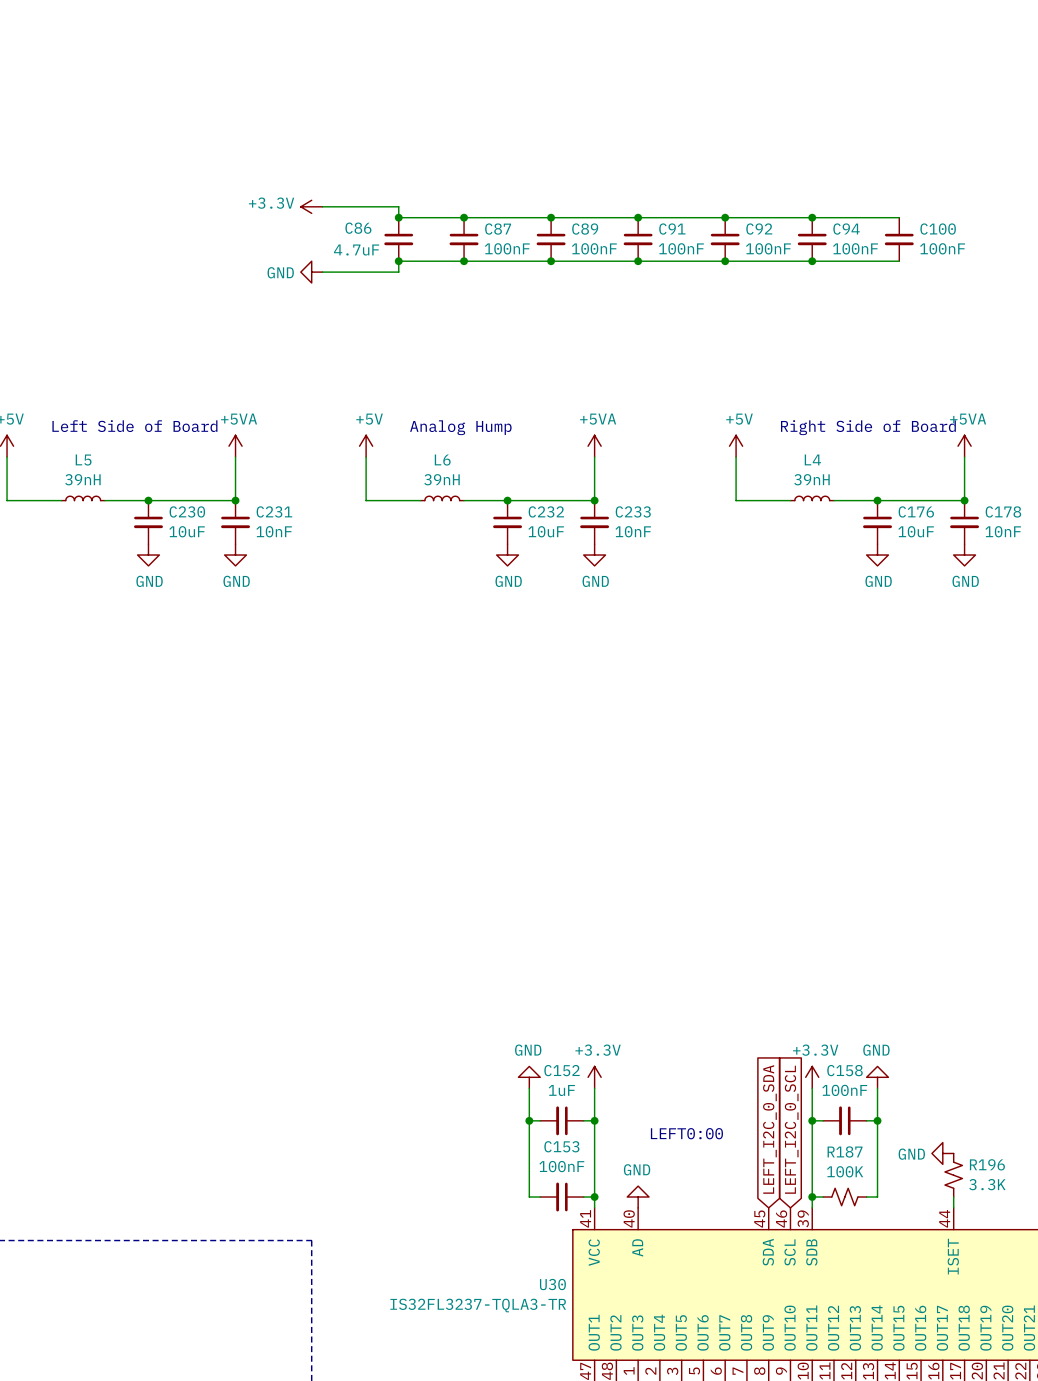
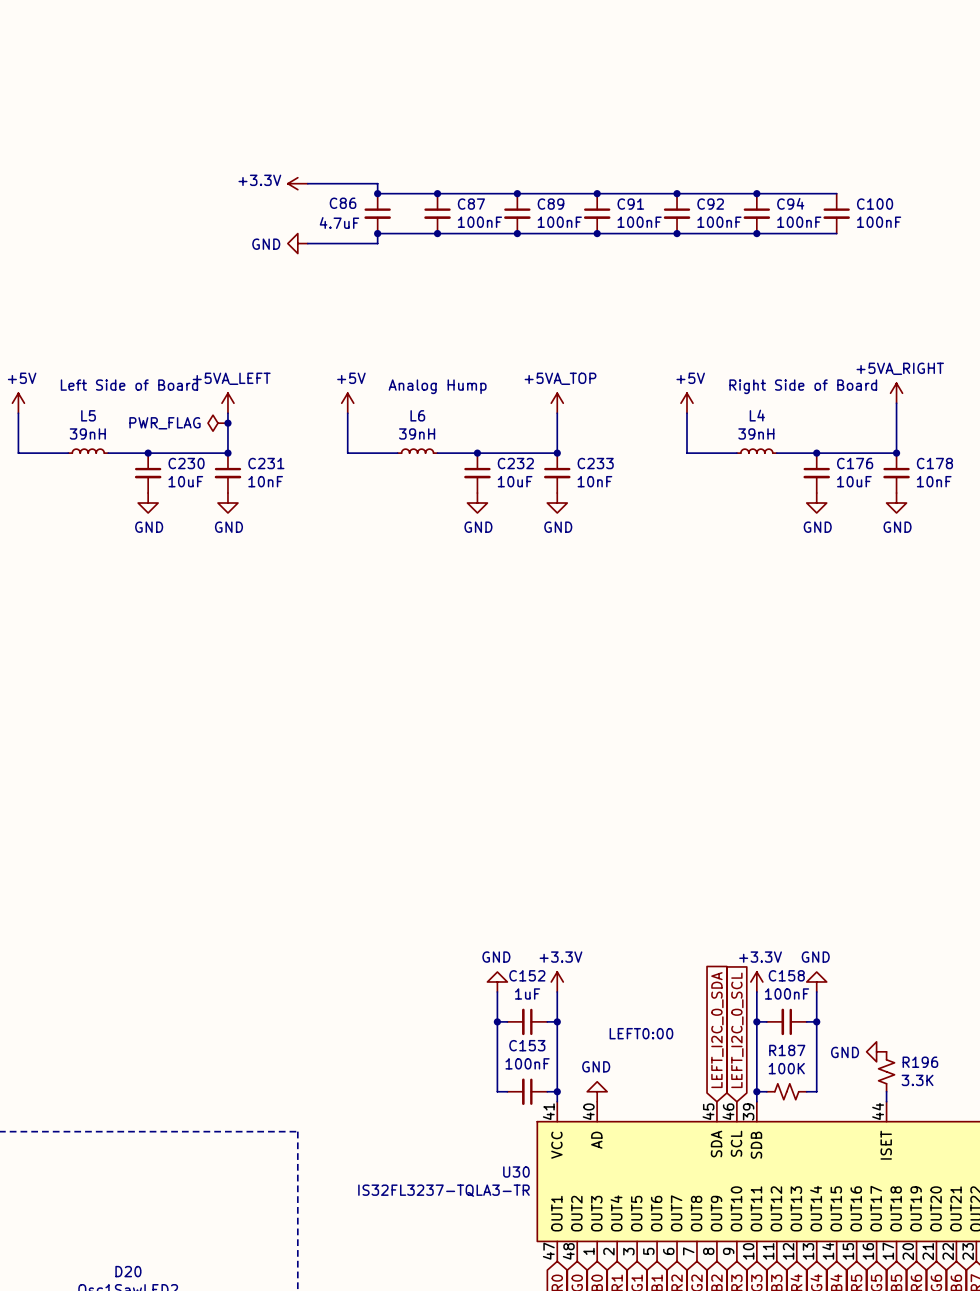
power symbol: none -> +5VA_RIGHT (896, 393)
power symbol: +5VA (235, 446) -> +5VA_LEFT (227, 403)
power symbol: +5VA (594, 446) -> +5VA_TOP (557, 403)
power symbol: +5VA (964, 446) -> none
power symbol: none -> PWR_FLAG (218, 423)
junction: none -> (227, 423)

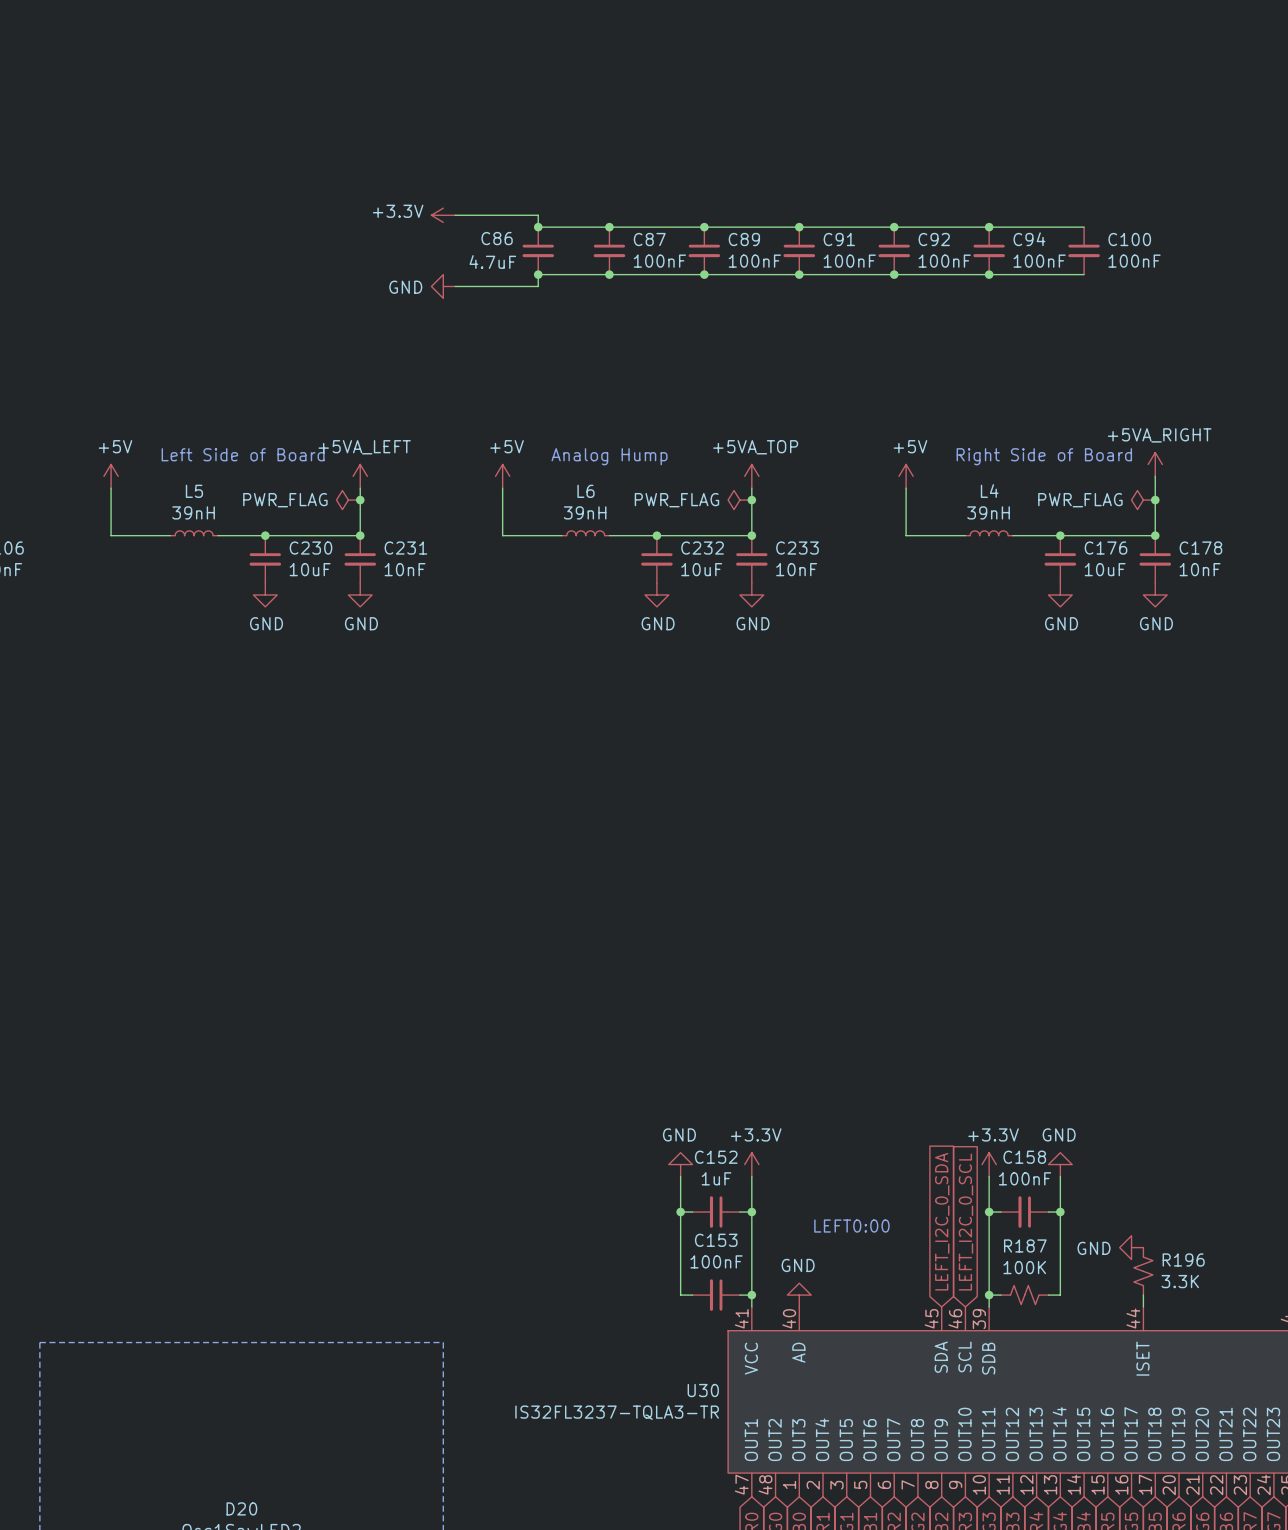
power symbol: none -> PWR_FLAG (739, 500)
junction: none -> (751, 500)
power symbol: none -> PWR_FLAG (1143, 500)
junction: none -> (1155, 500)

